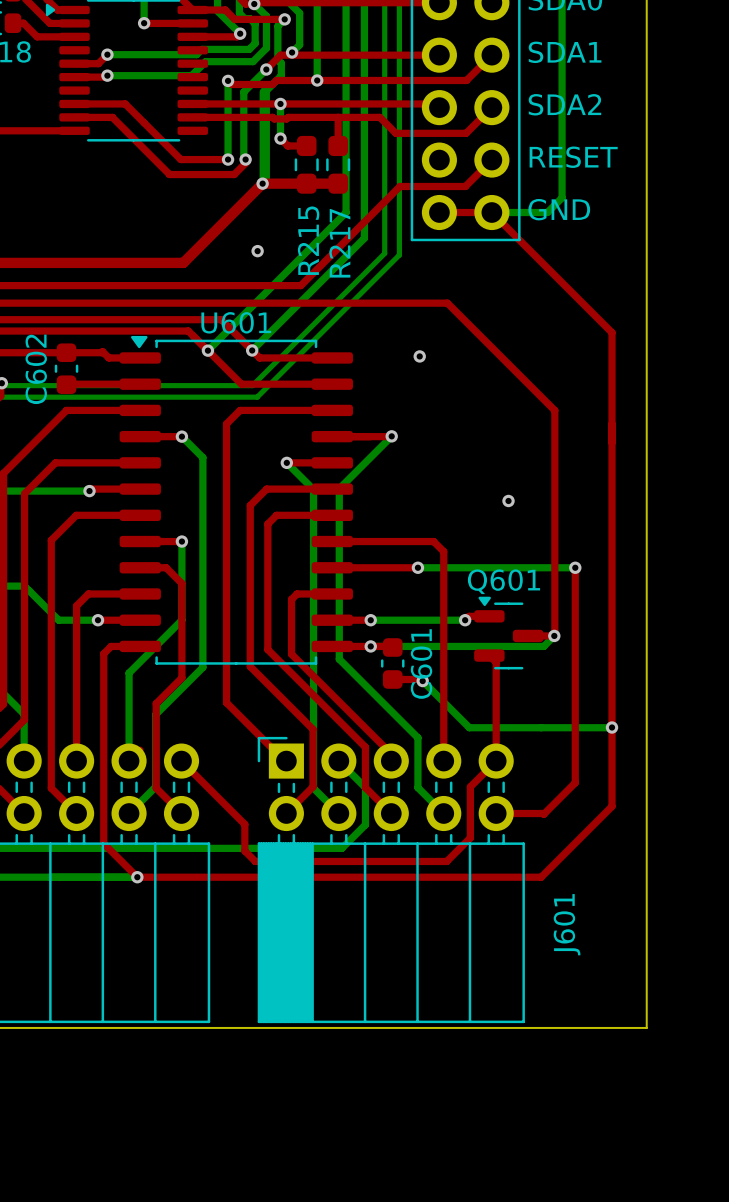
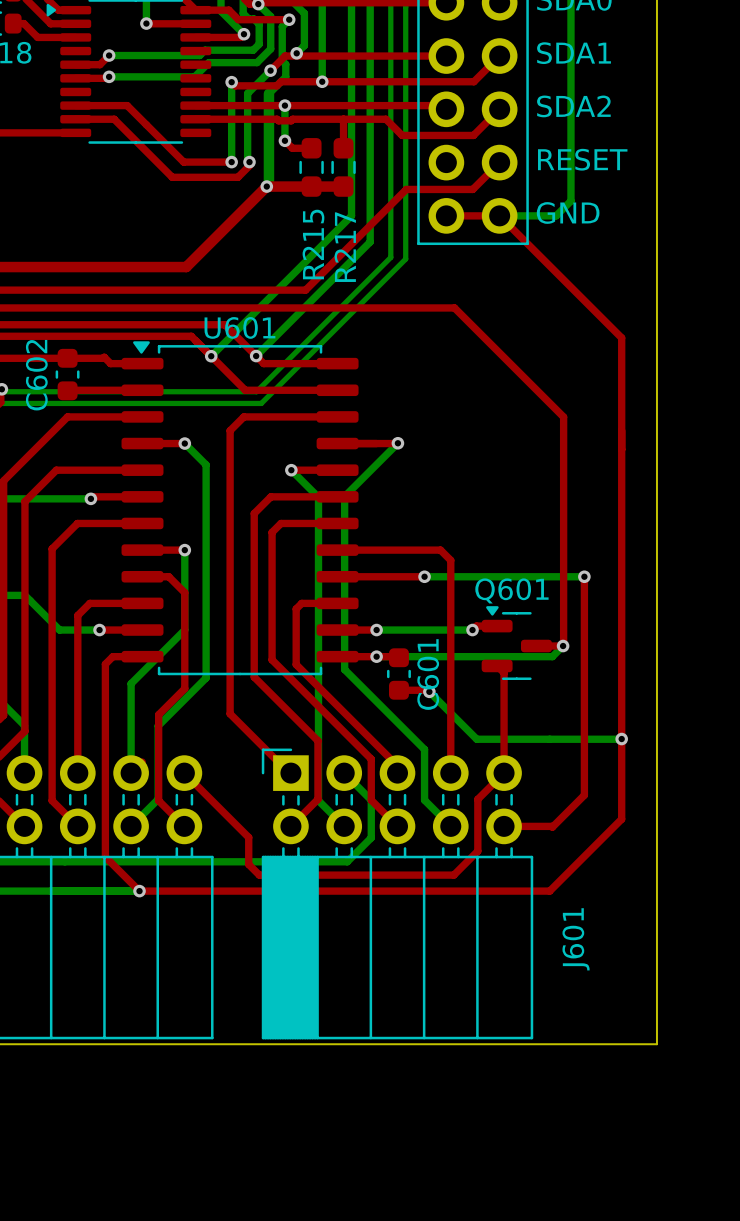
via: (257, 251) -> none
via: (419, 356) -> none
via: (508, 500) -> none

